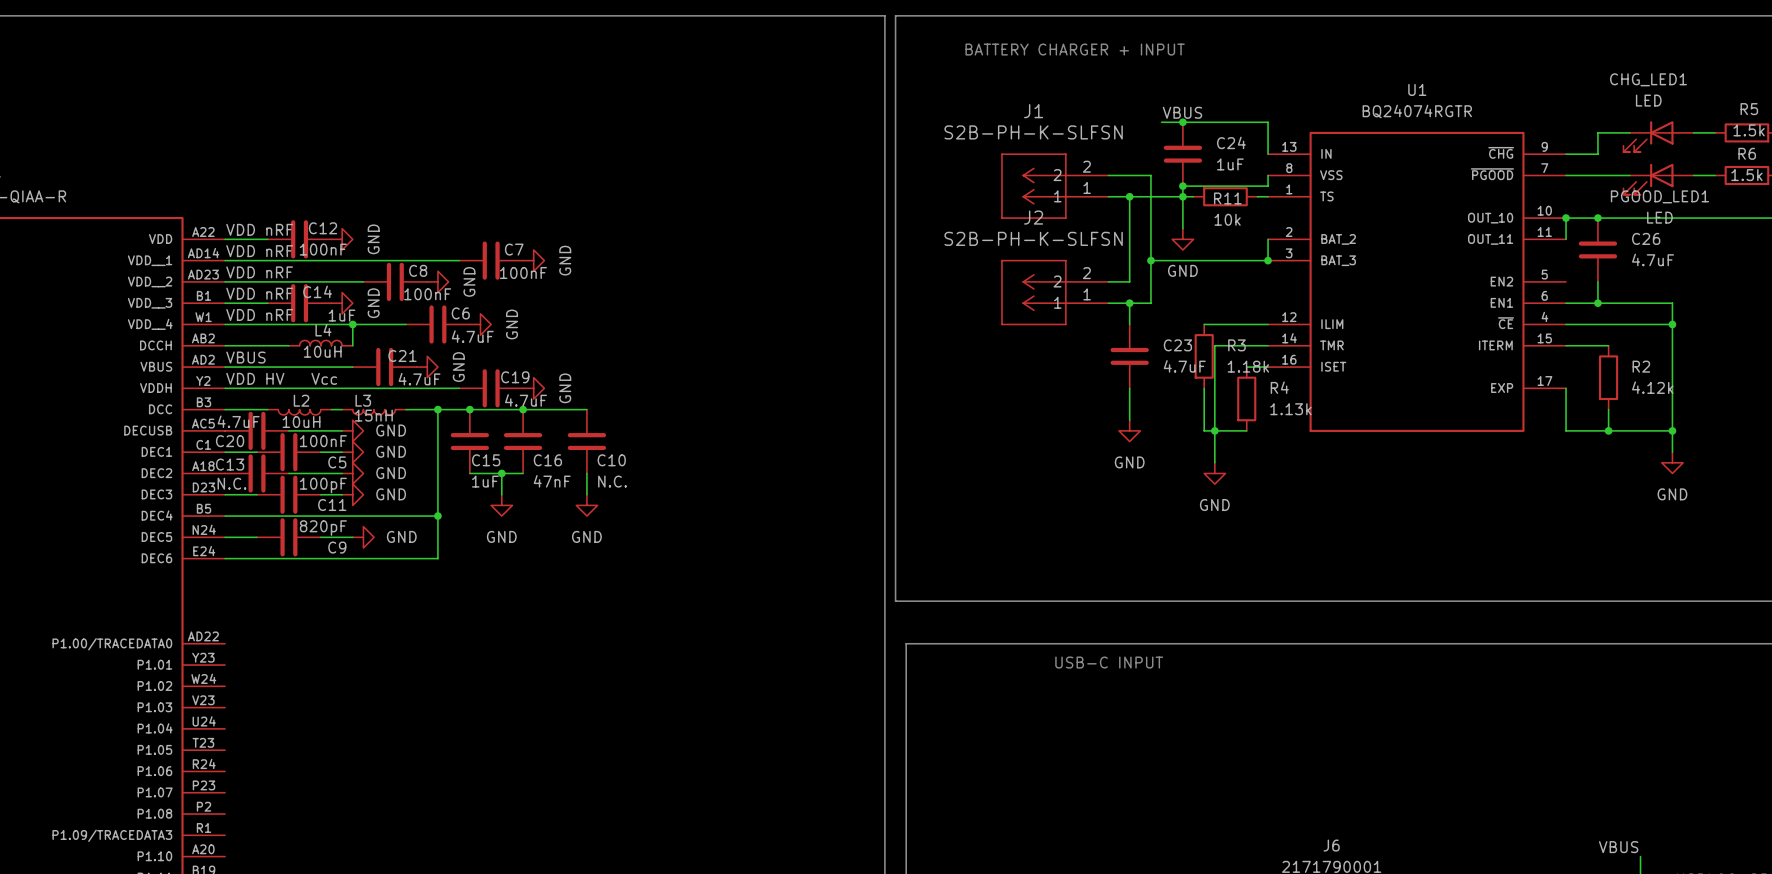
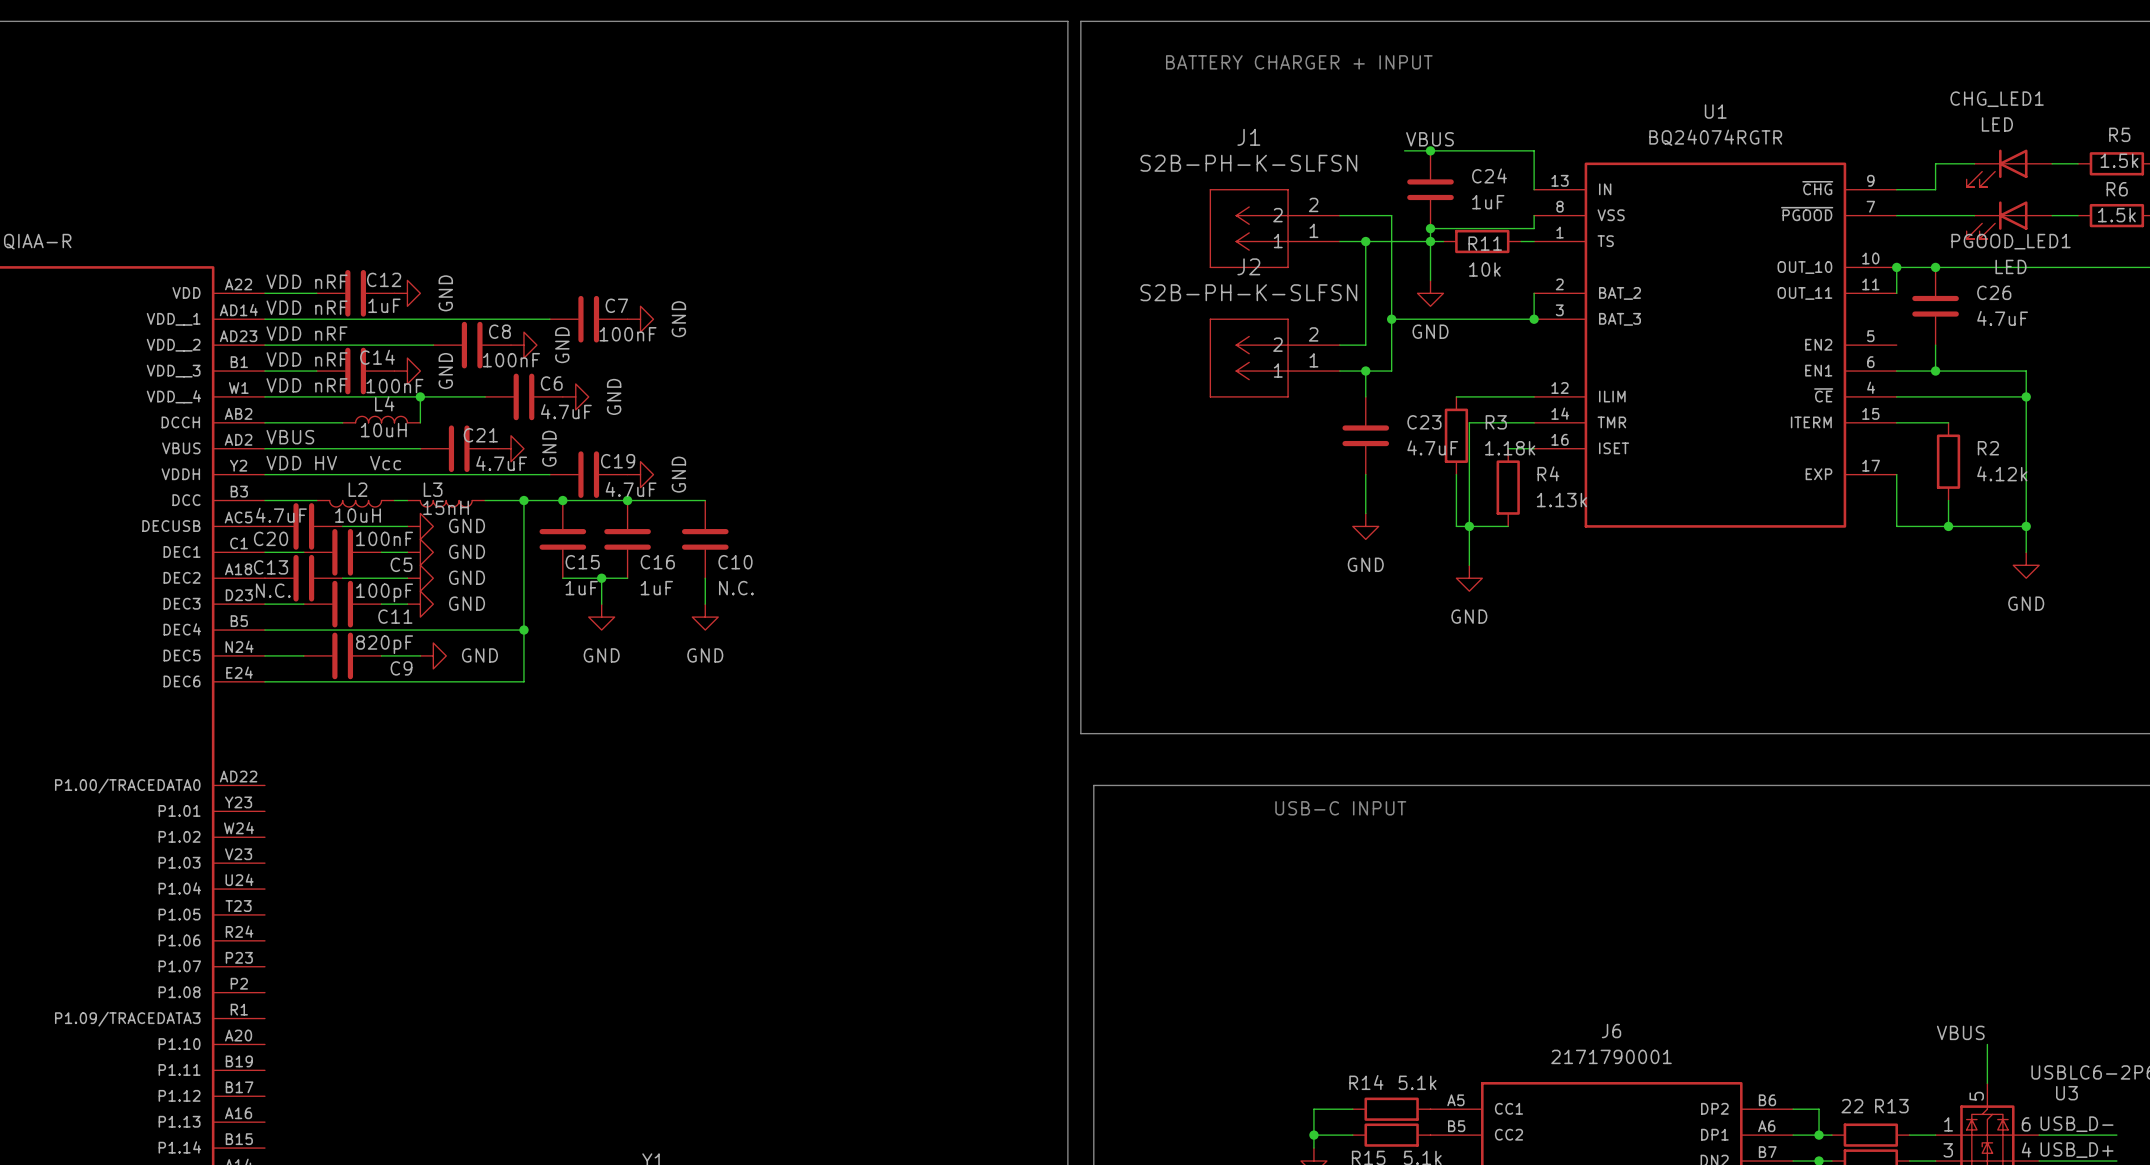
C12 value: 100nF (323, 249) -> 1uF (384, 305)
C14 value: 1uF (342, 315) -> 100nF (394, 386)
C16 value: 47nF (552, 481) -> 1uF (656, 588)

